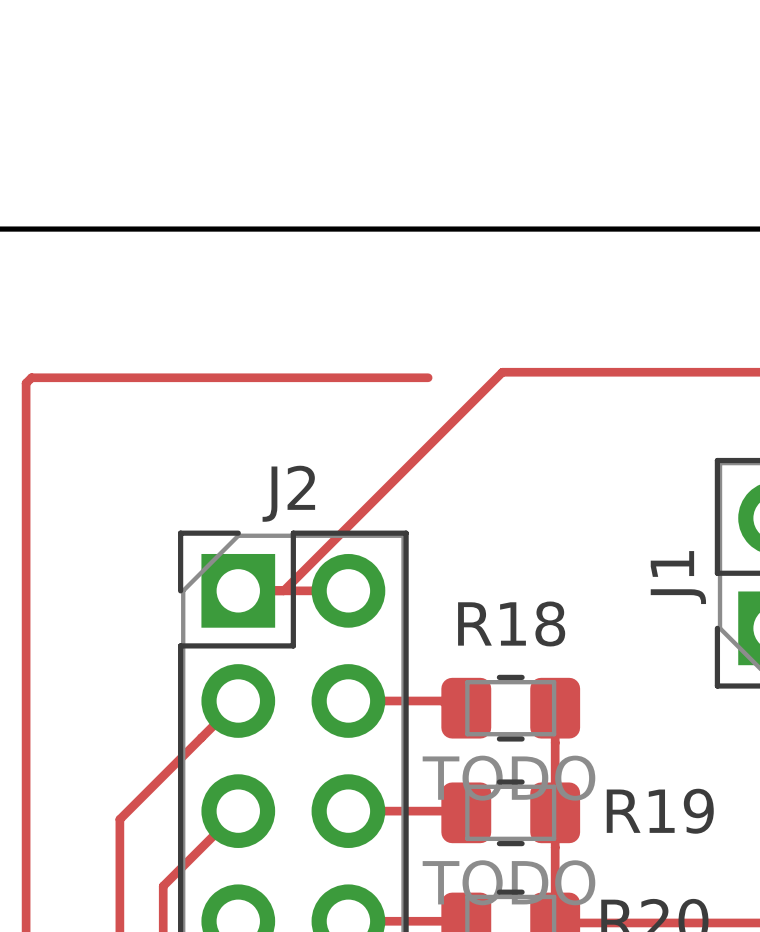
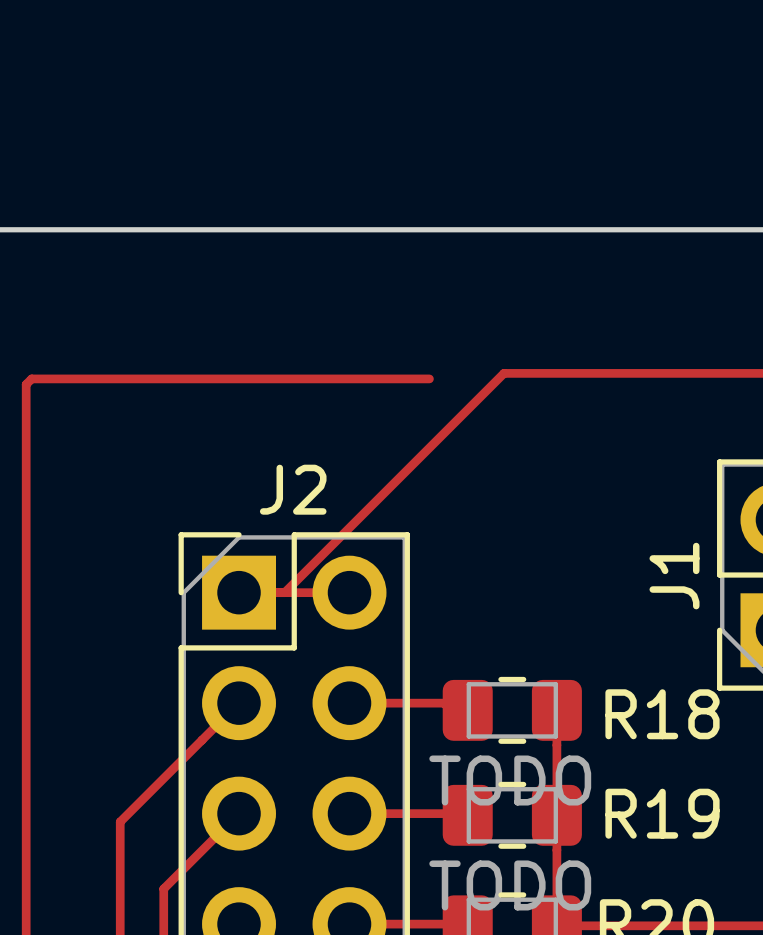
R18 name position: R18 (511, 623) -> R18 (662, 714)

